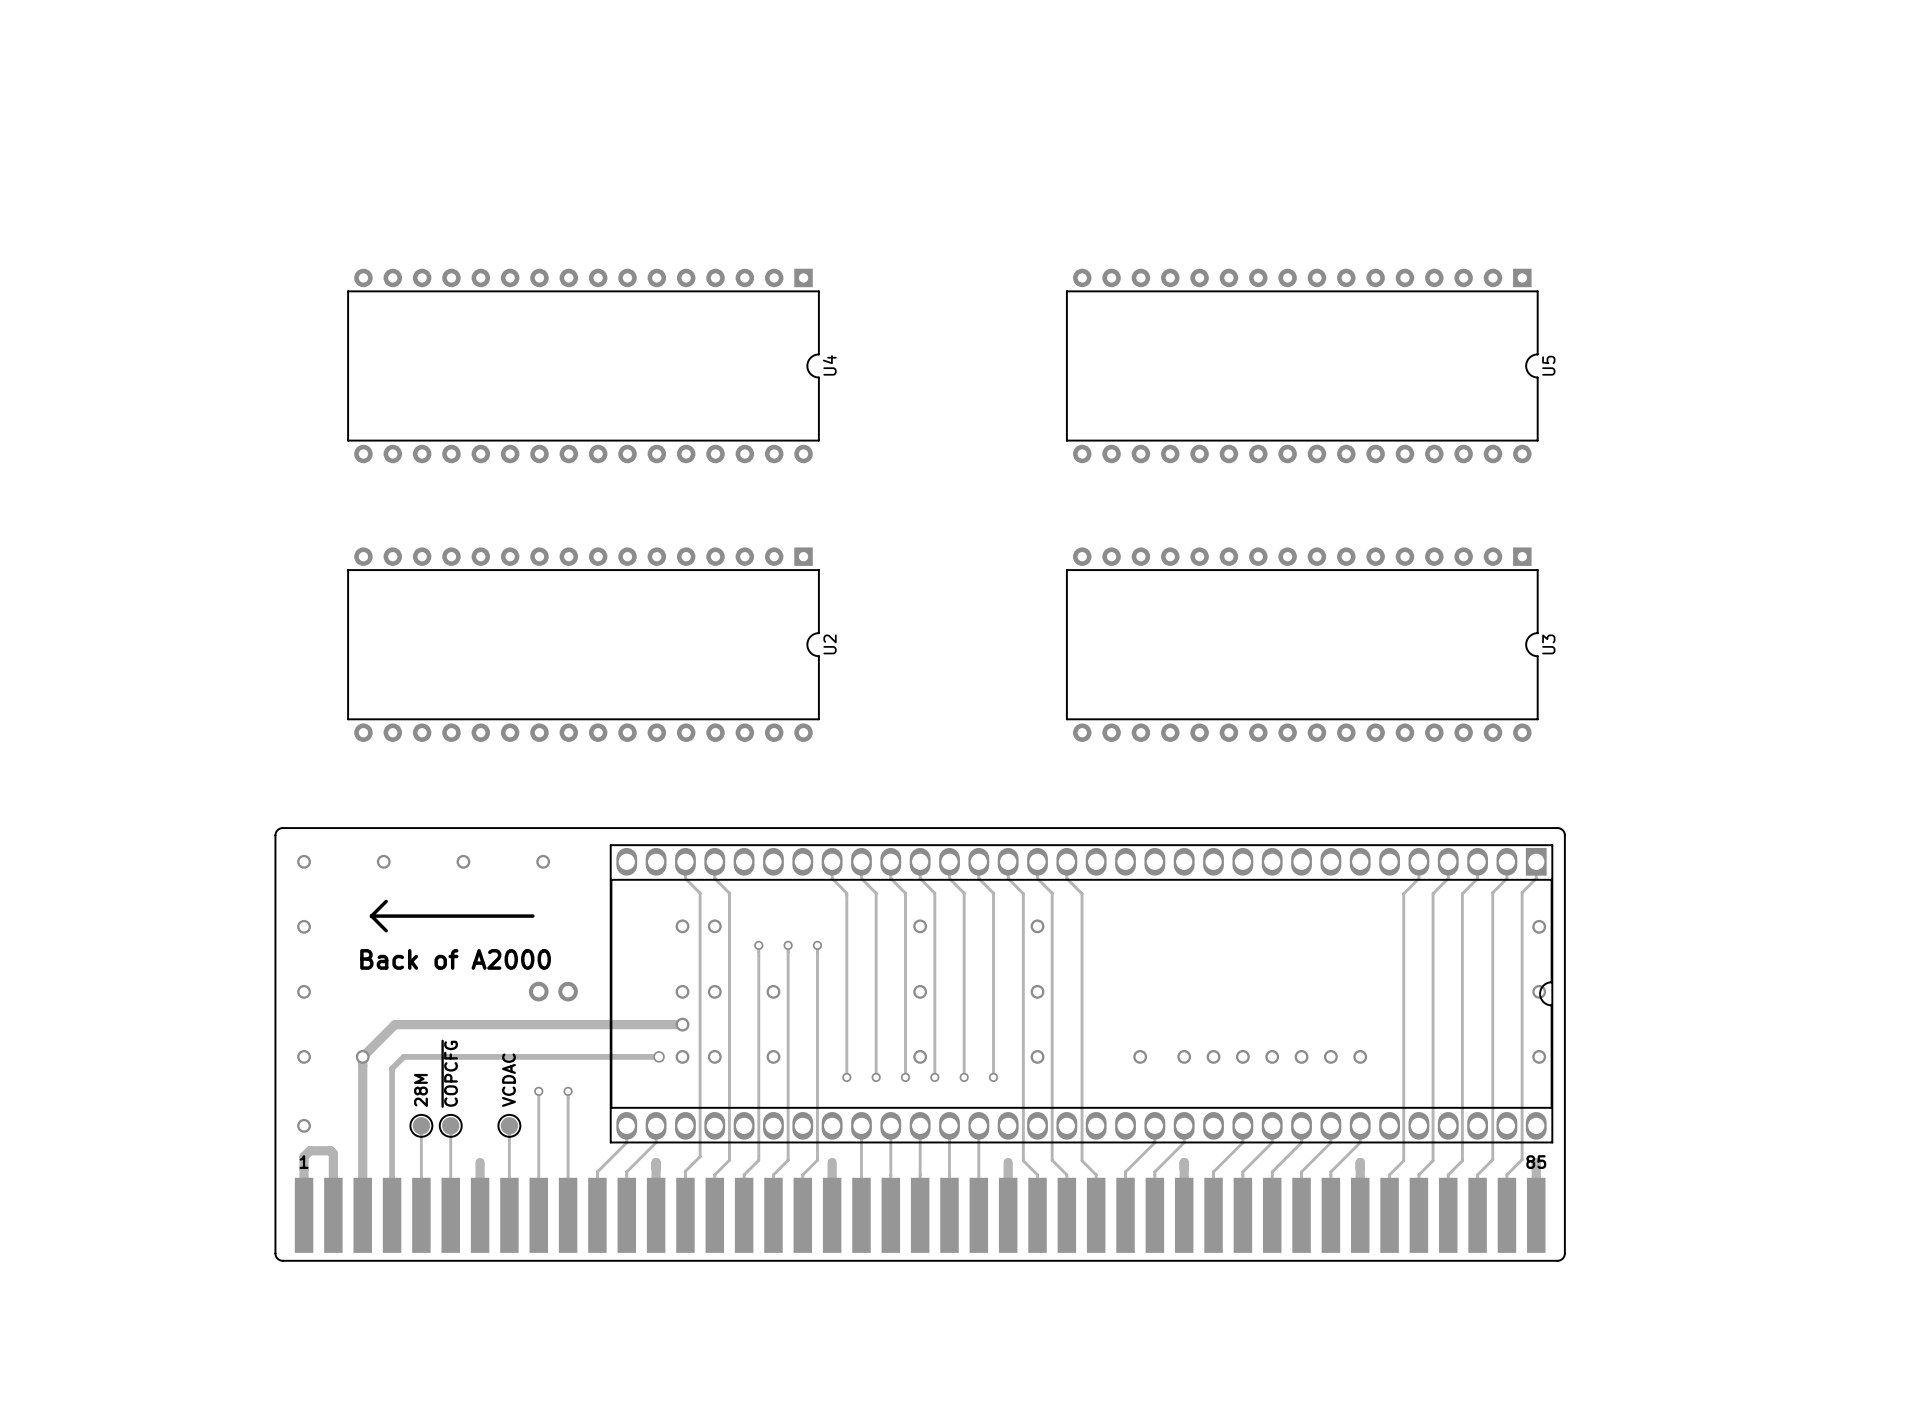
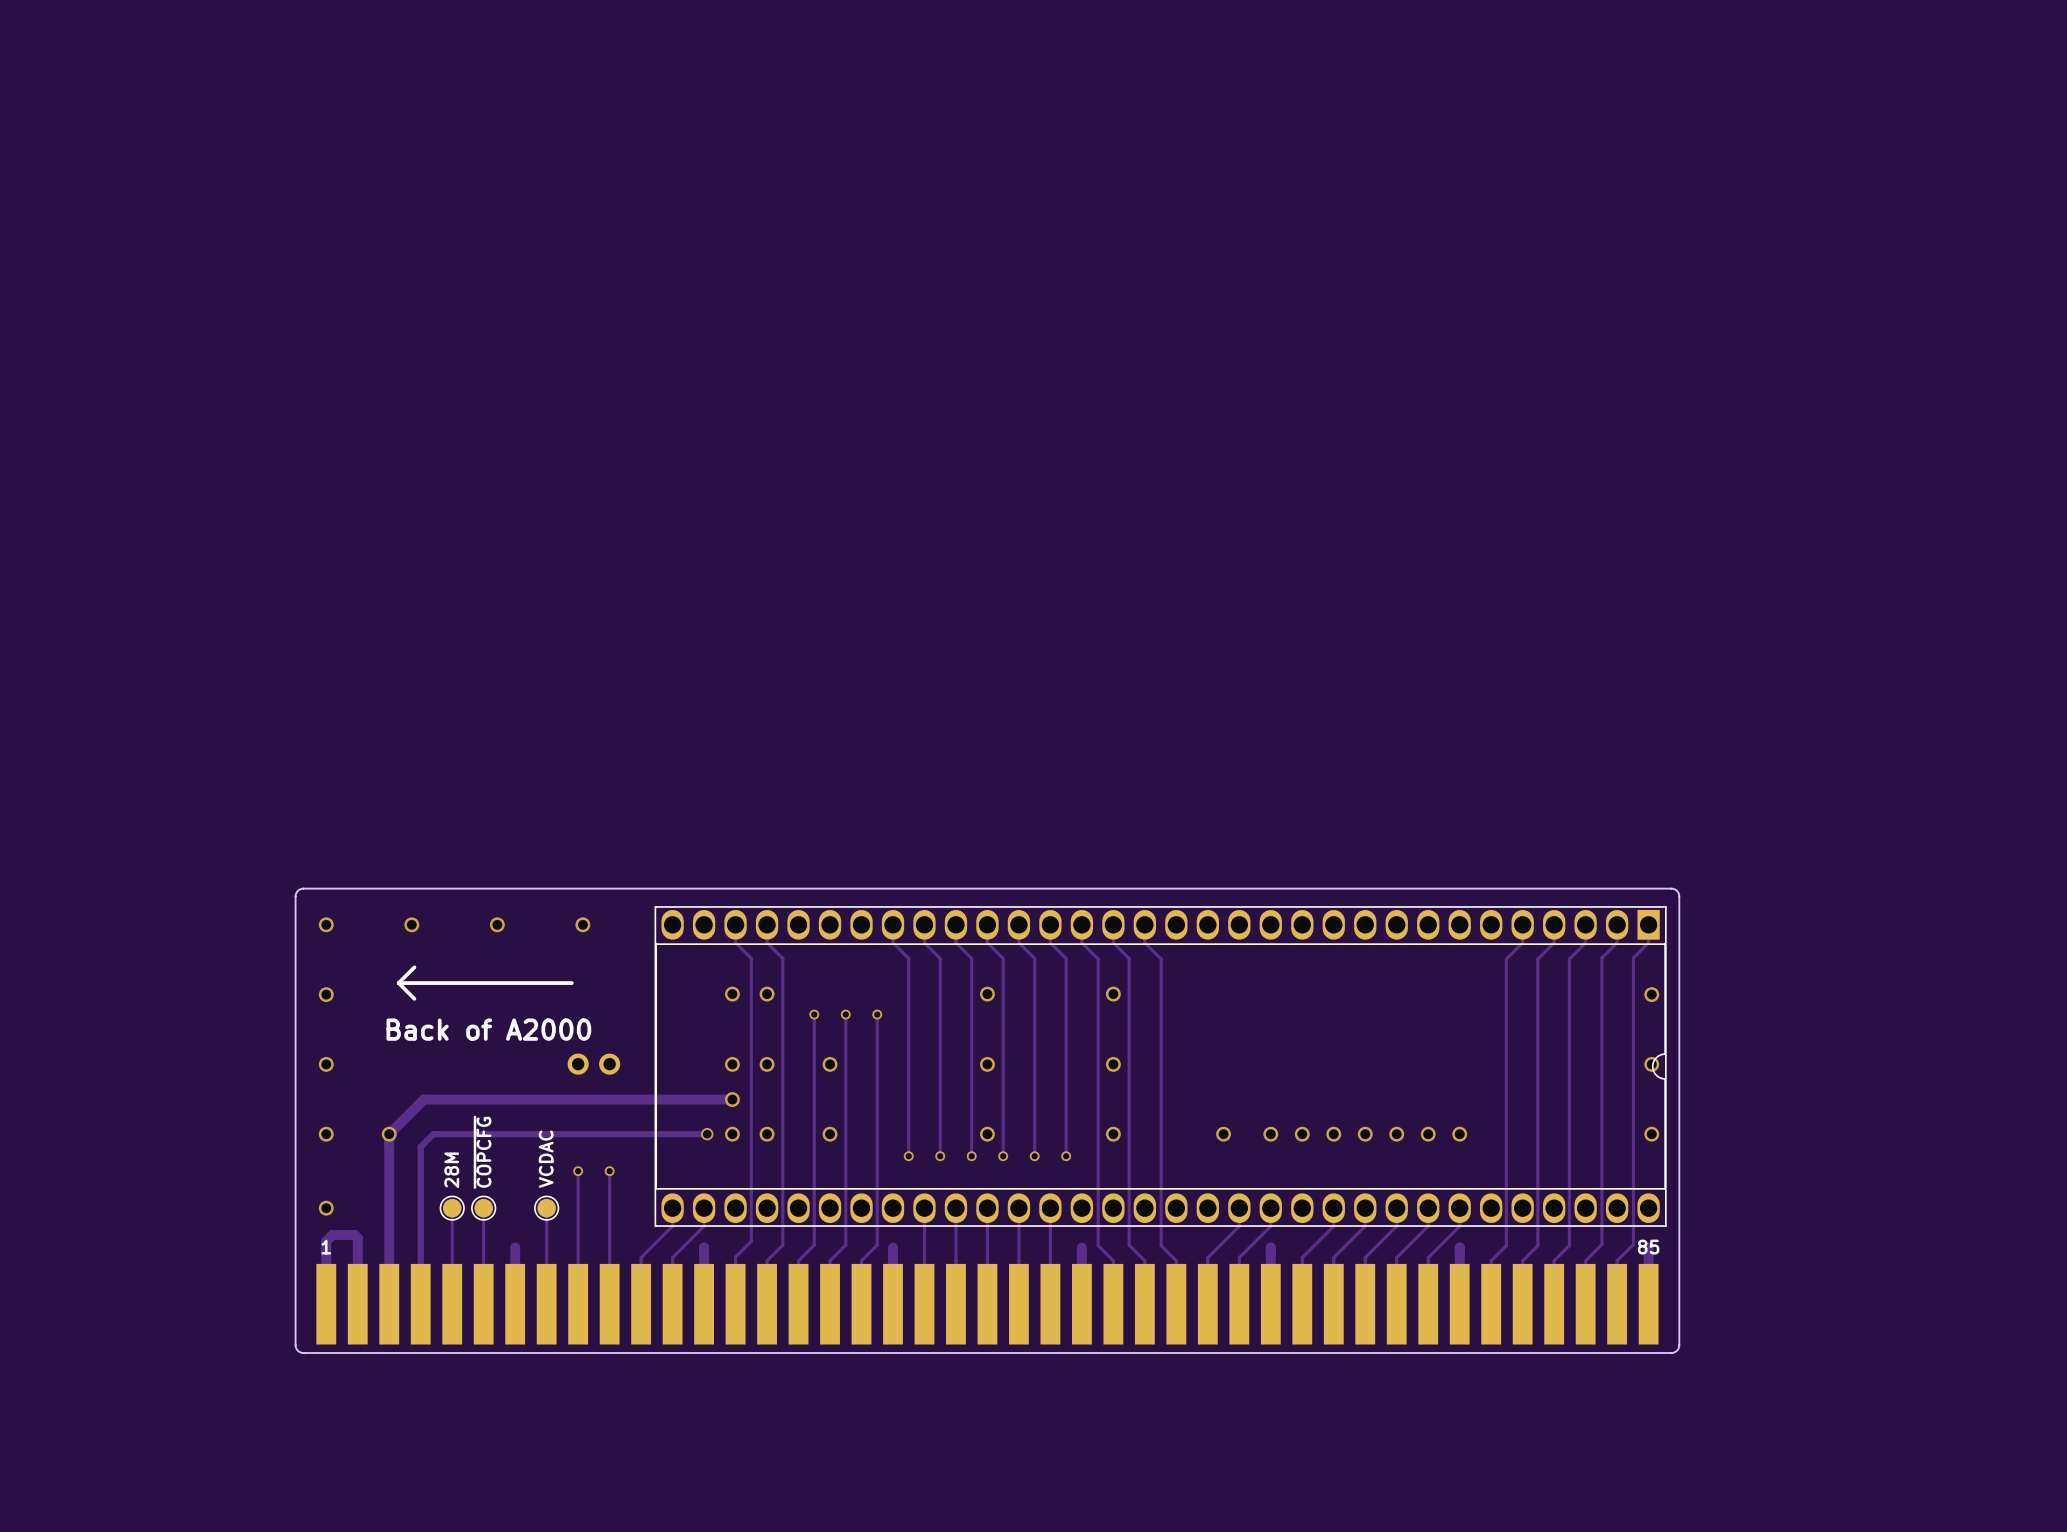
U4: (583, 365) -> none
U5: (1302, 365) -> none
U2: (583, 644) -> none
U3: (1302, 644) -> none

